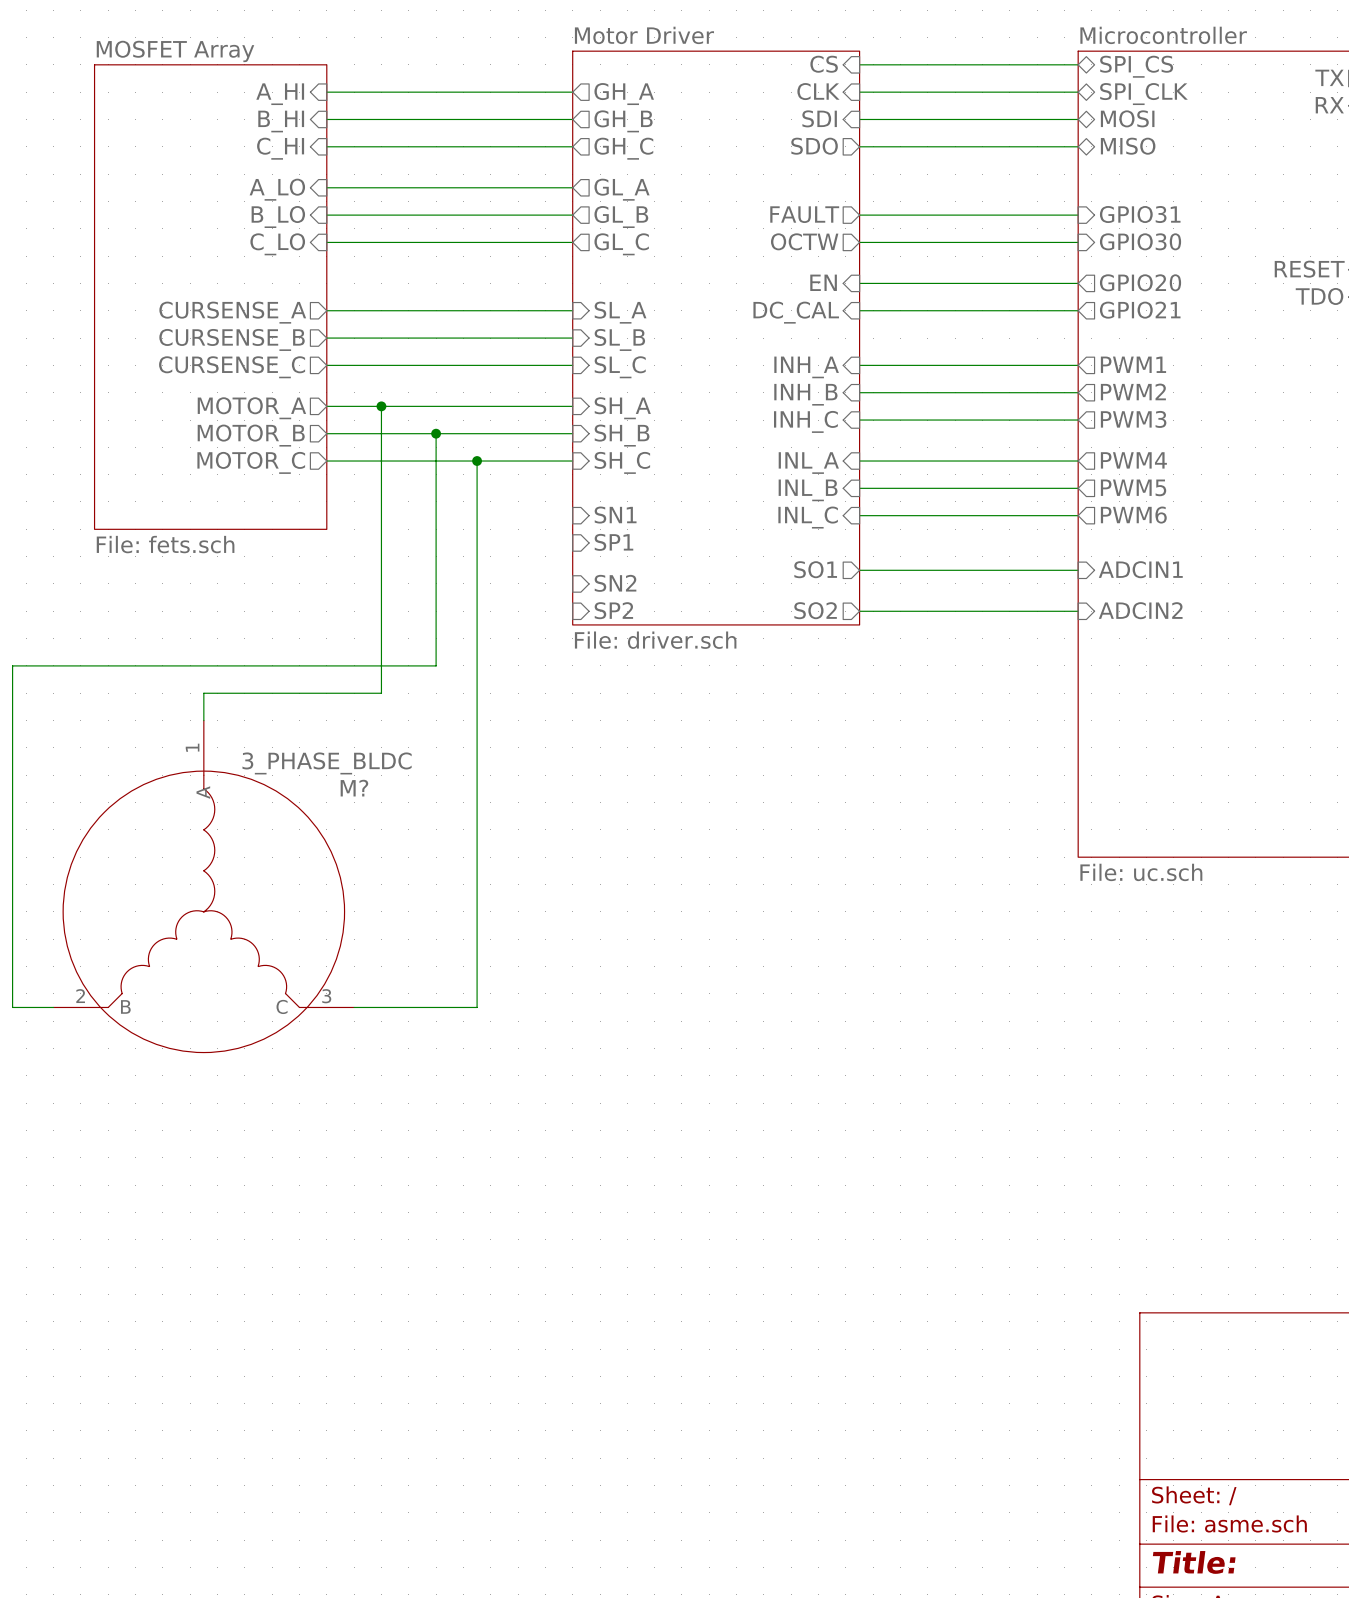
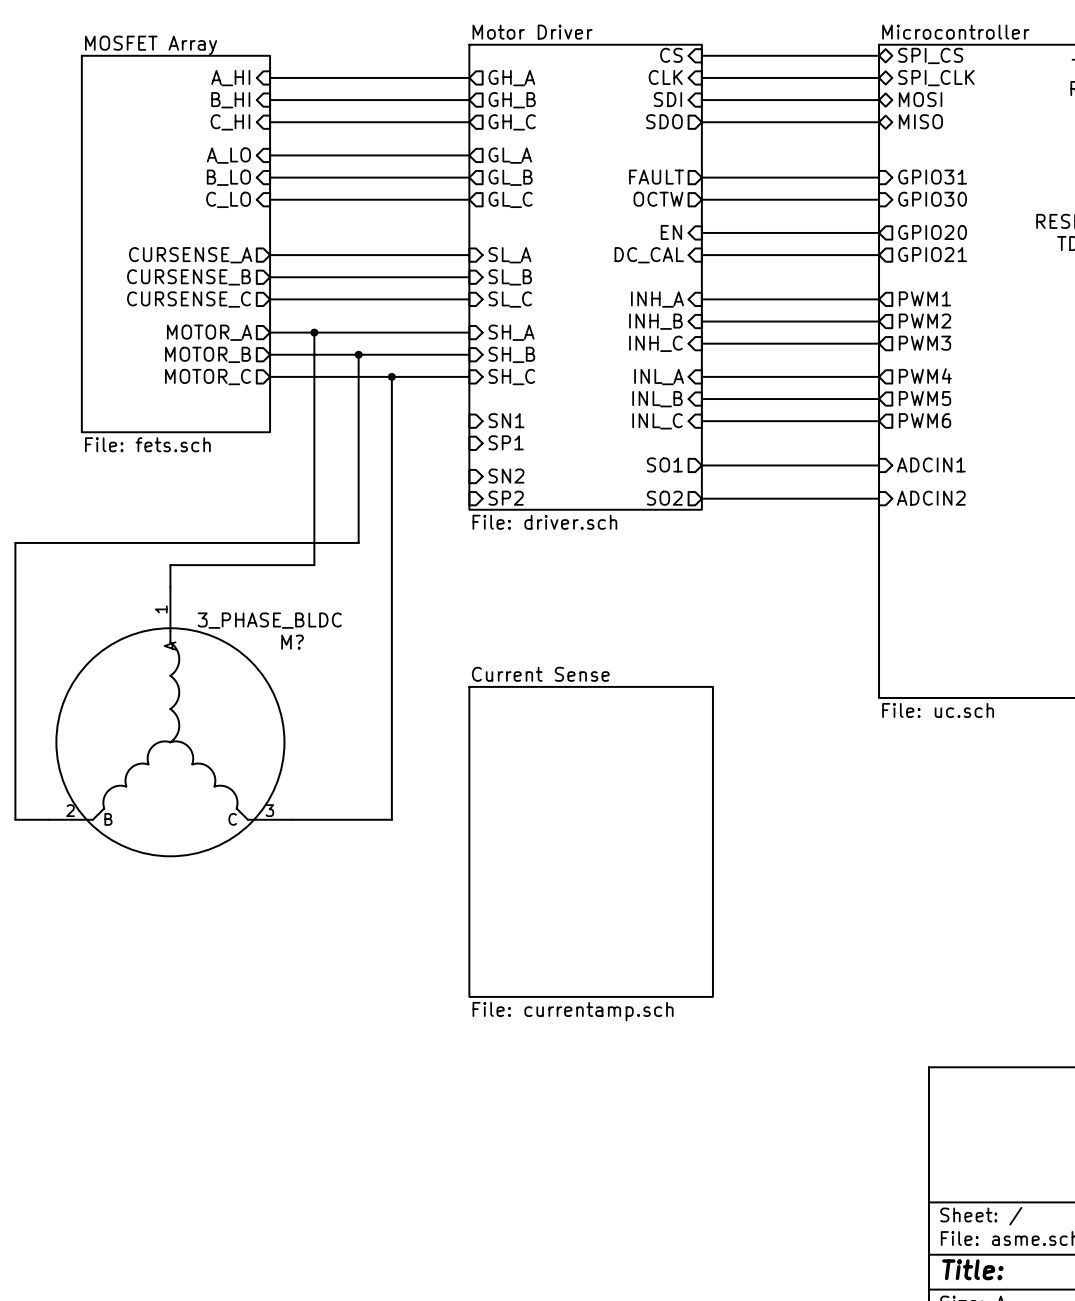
sheet Current Sense: none -> File: currentamp.sch (591, 841)

